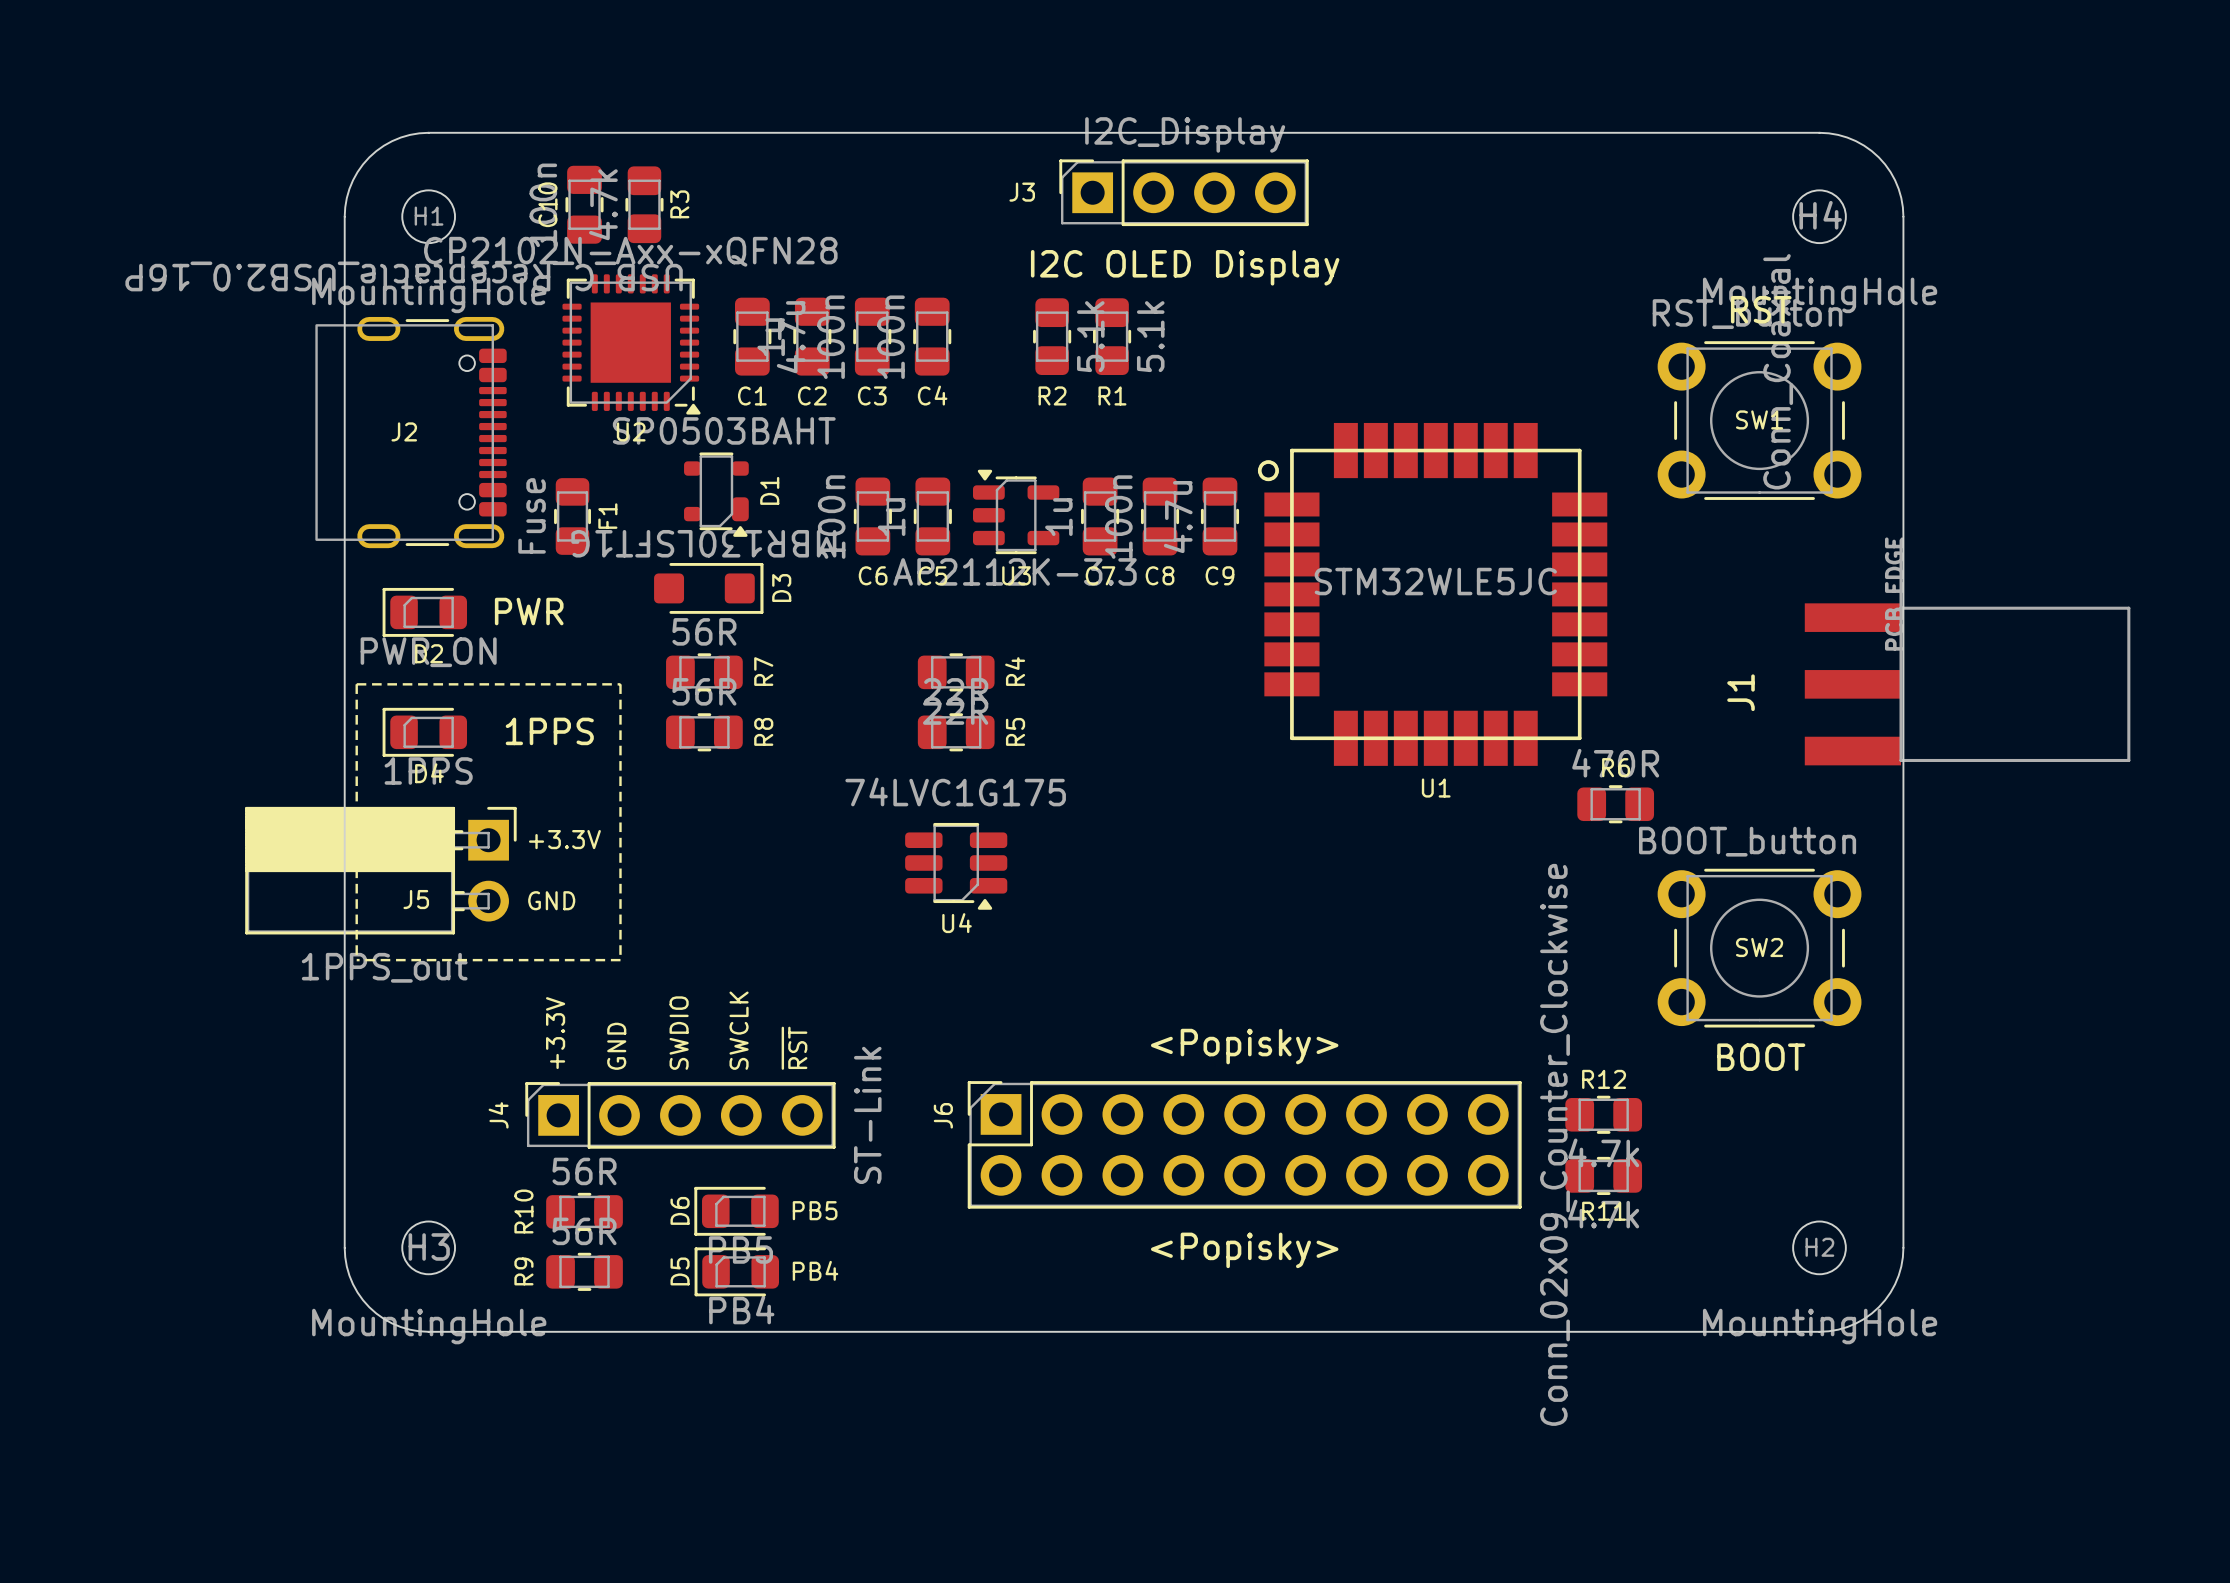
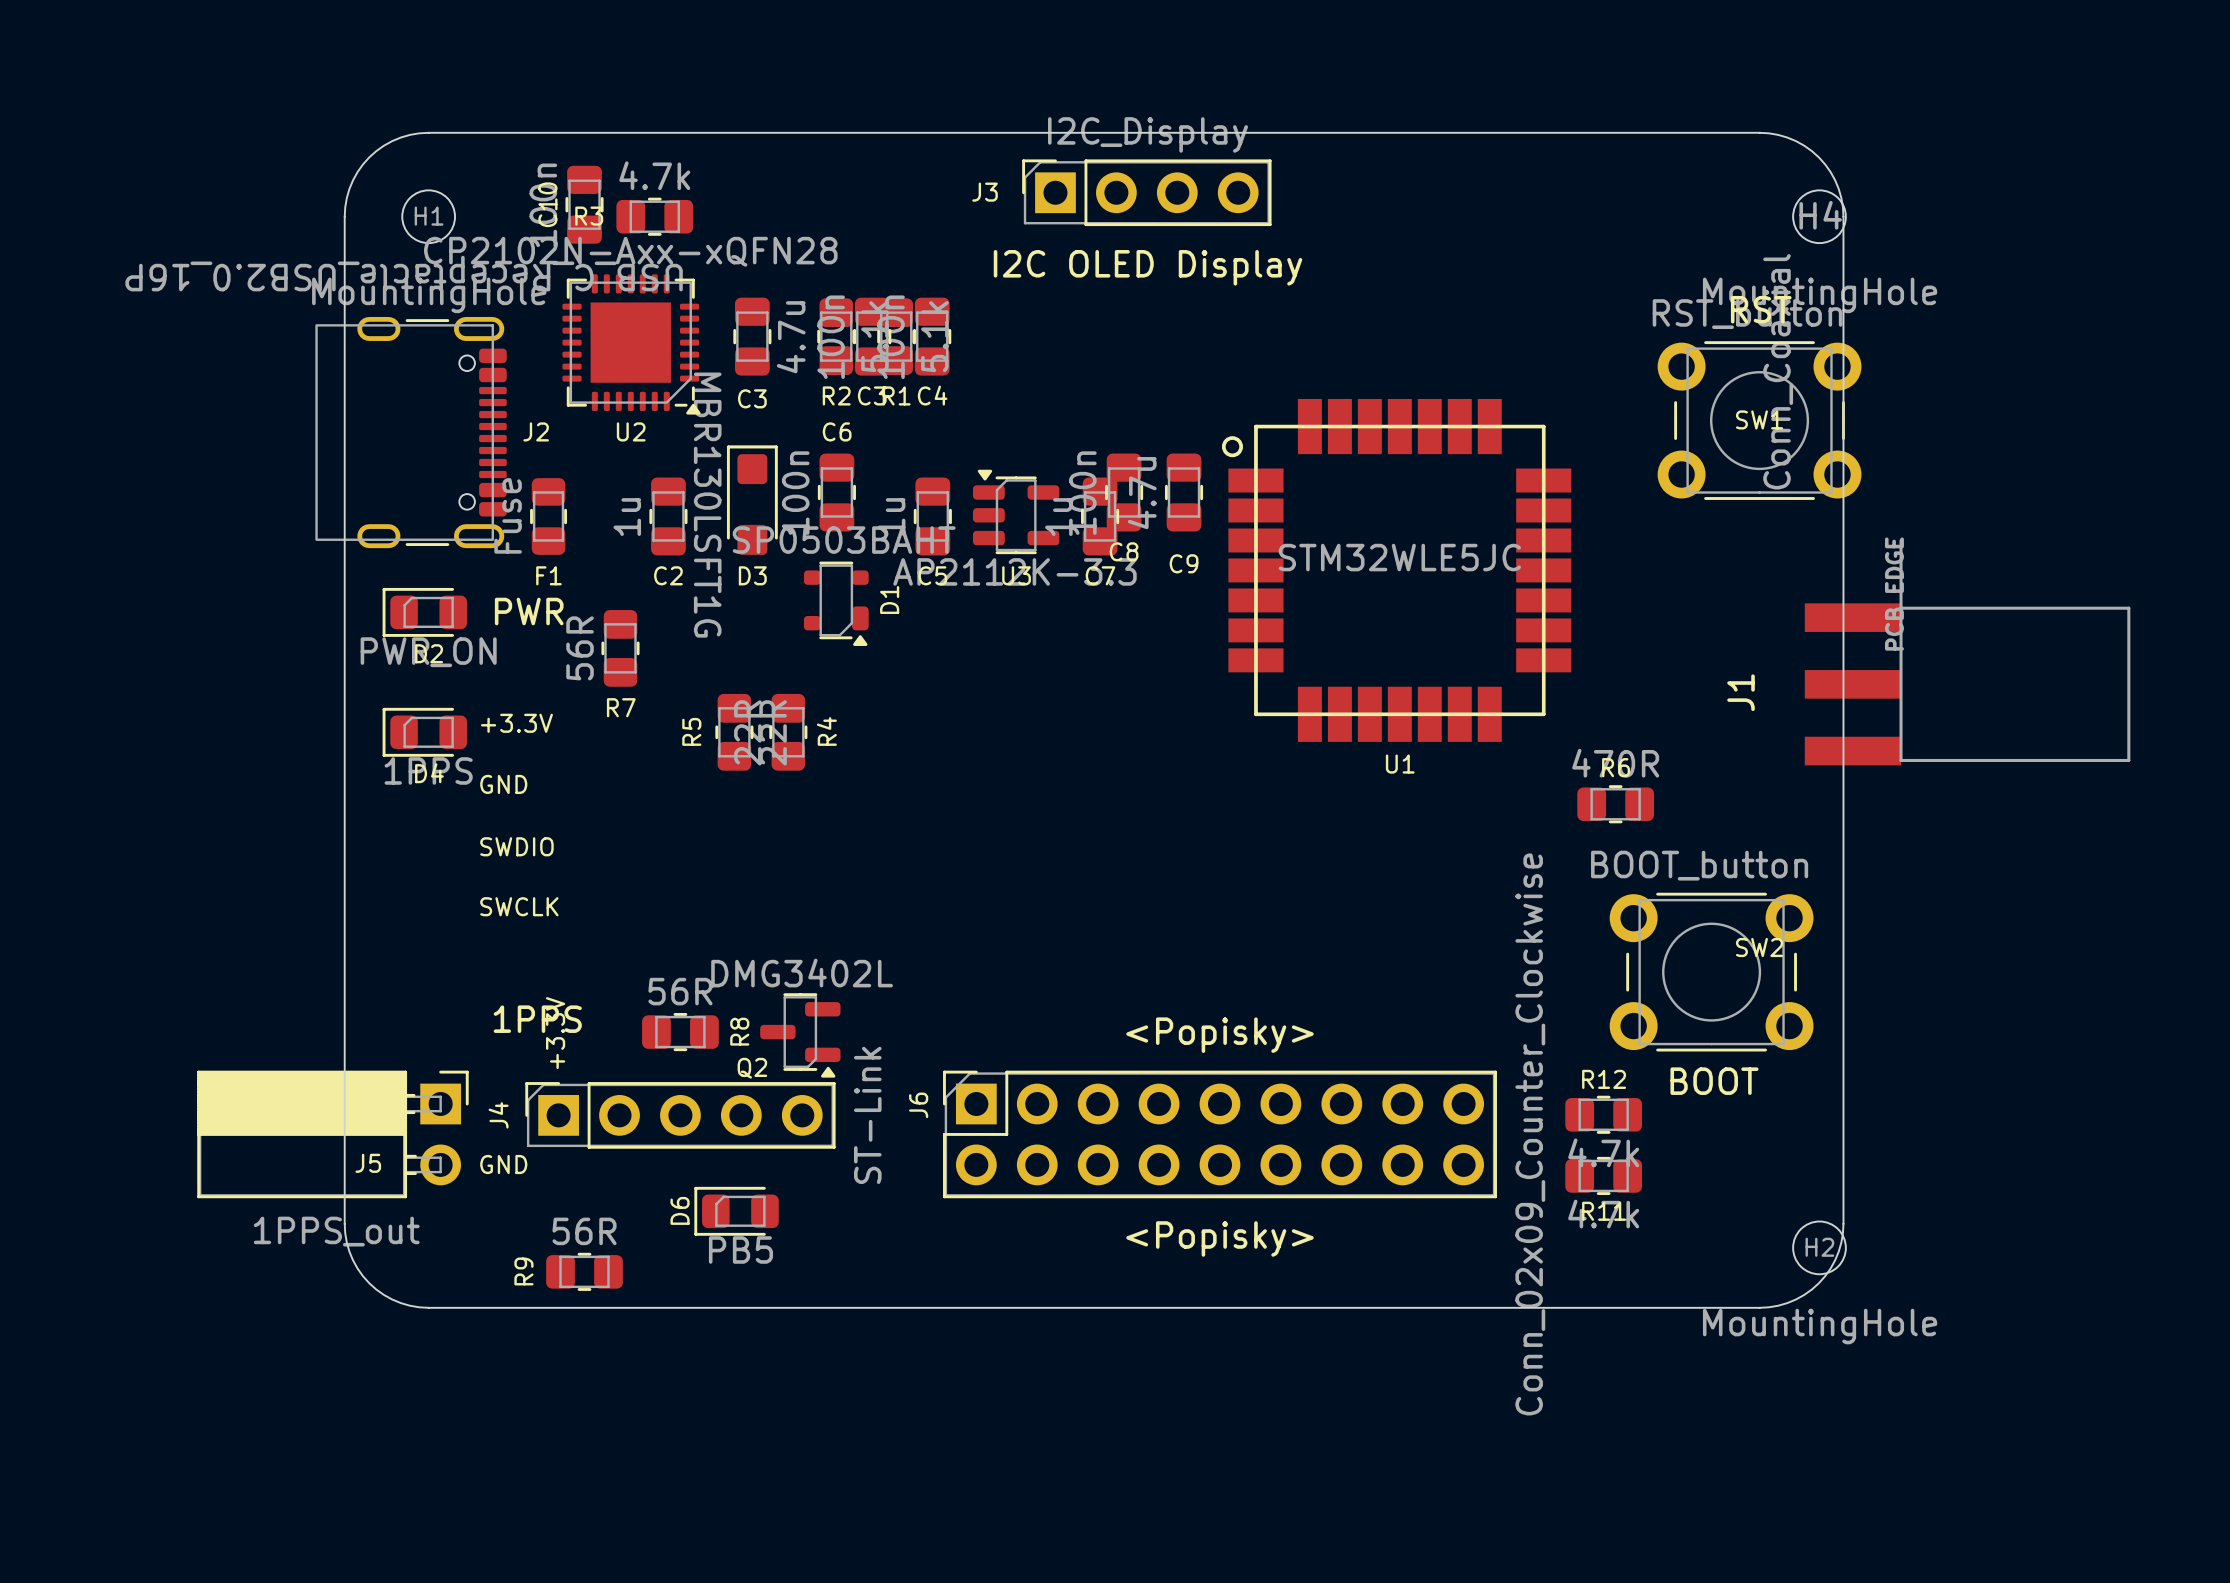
board edge: (1759, 132) (1828, 133) (1855, 141) (1871, 151) (1890, 172) (1898, 189) (1902, 207) (1903, 1247) (1901, 1266) (1895, 1284) (1885, 1300) (1871, 1313) (1847, 1327) (1819, 1331) (419, 1331) (400, 1327) (383, 1318) (369, 1307) (357, 1292) (346, 1266) (344, 1223) -> (1759, 132) (1778, 134) (1795, 141) (1818, 157) (1830, 172) (1838, 189) (1843, 216) (1843, 1223) (1841, 1242) (1835, 1260) (1825, 1276) (1811, 1289) (1787, 1303) (1759, 1307) (428, 1307) (409, 1305) (392, 1299) (369, 1283) (357, 1268) (349, 1251) (344, 1223)
J3 position: (1184, 192) -> (1146, 192)
R3 rotation: 0° (644, 204) -> 90° clockwise (654, 216)
R3 name position: R3 (679, 204) -> R3 (589, 216)
text position: I2C OLED Display (1185, 267) -> I2C OLED Display (1147, 267)
C2 position: (812, 336) -> (668, 516)
R2 position: (1052, 336) -> (836, 336)
R1 position: (1112, 336) -> (896, 336)
C1 name: C1 (752, 395) -> C3 (752, 398)
J2 name position: J2 (404, 431) -> J2 (536, 431)
D1 position: (716, 494) -> (836, 603)
F1 position: (572, 516) -> (548, 516)
F1 name rotation: 0° (607, 516) -> 90° clockwise (548, 575)
F1 name position: F1 (607, 516) -> F1 (548, 575)
C6 position: (872, 516) -> (836, 492)
C8 position: (1160, 516) -> (1124, 492)
C9 position: (1219, 516) -> (1184, 492)
C6 name position: C6 (873, 575) -> C6 (837, 431)
C9 name position: C9 (1219, 575) -> C9 (1184, 563)
D3 rotation: 0° (708, 588) -> 90° counterclockwise (752, 500)
D3 position: (708, 588) -> (752, 500)
D3 name position: D3 (781, 588) -> D3 (752, 575)
U1 position: (1432, 594) -> (1396, 570)
R7 value position: 56R (704, 631) -> 56R (580, 648)
R7 rotation: 0° (704, 672) -> 90° clockwise (620, 648)
R7 position: (704, 672) -> (620, 648)
R4 rotation: 0° (956, 672) -> 90° clockwise (788, 732)
R4 position: (956, 672) -> (788, 732)
line: (356, 684) (620, 684) (620, 960) (356, 960) (356, 684) -> none
text position: 1PPS (549, 731) -> 1PPS (537, 1019)
R5 name position: R5 (1015, 731) -> R5 (691, 731)
R8 position: (704, 732) -> (680, 1032)
R5 rotation: 0° (956, 732) -> 90° clockwise (734, 732)
R5 position: (956, 732) -> (734, 732)
text position: +3.3V (564, 839) -> +3.3V (516, 723)
U4: 74LVC1G175 (956, 866) -> none
J5 position: (380, 870) -> (332, 1134)
text position: GND (551, 900) -> GND (503, 784)
SW2 position: (1759, 948) -> (1711, 972)
line: (782, 1027) (782, 1068) -> none
text rotation: 0° (739, 1030) -> 90° clockwise (519, 906)
text position: SWCLK (739, 1030) -> SWCLK (519, 906)
text rotation: 0° (679, 1033) -> 90° clockwise (516, 846)
text position: SWDIO (679, 1033) -> SWDIO (516, 846)
Q2: none -> DMG3402L (800, 1035)
text: GND (616, 1046) -> none
text position: <Popisky> (1244, 1046) -> <Popisky> (1219, 1035)
text: RST (797, 1047) -> none
text position: BOOT (1761, 1057) -> BOOT (1714, 1081)
J6 position: (1244, 1144) -> (1219, 1134)
text: none -> GND (503, 1164)
text: PB5 (815, 1210) -> none
R10: 56R (584, 1211) -> none
H3: MountingHole (428, 1247) -> none
text position: <Popisky> (1244, 1250) -> <Popisky> (1219, 1238)
text: PB4 (815, 1270) -> none
D5: PB4 (736, 1271) -> none

